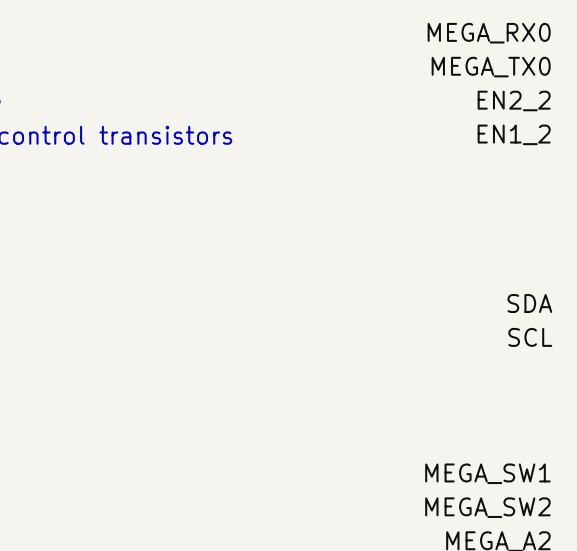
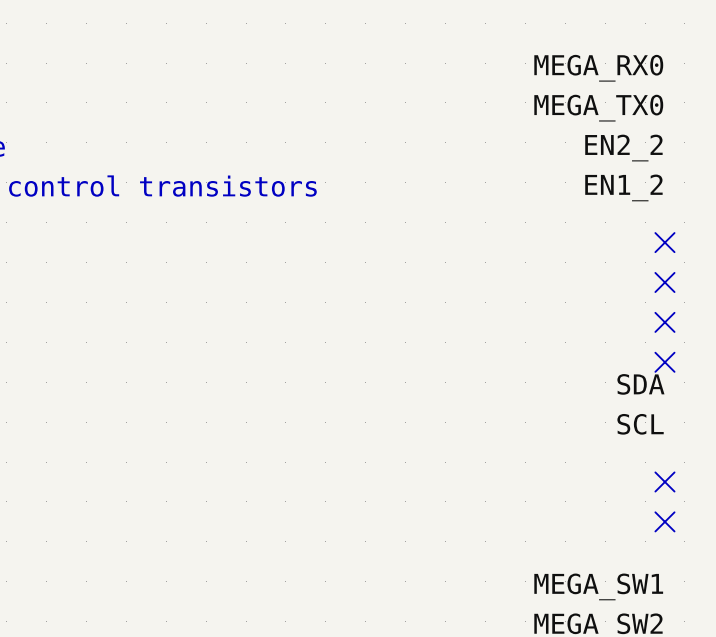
no-connect mark: none -> (664, 242)
no-connect mark: none -> (664, 282)
no-connect mark: none -> (664, 322)
no-connect mark: none -> (664, 362)
no-connect mark: none -> (664, 481)
no-connect mark: none -> (664, 521)

